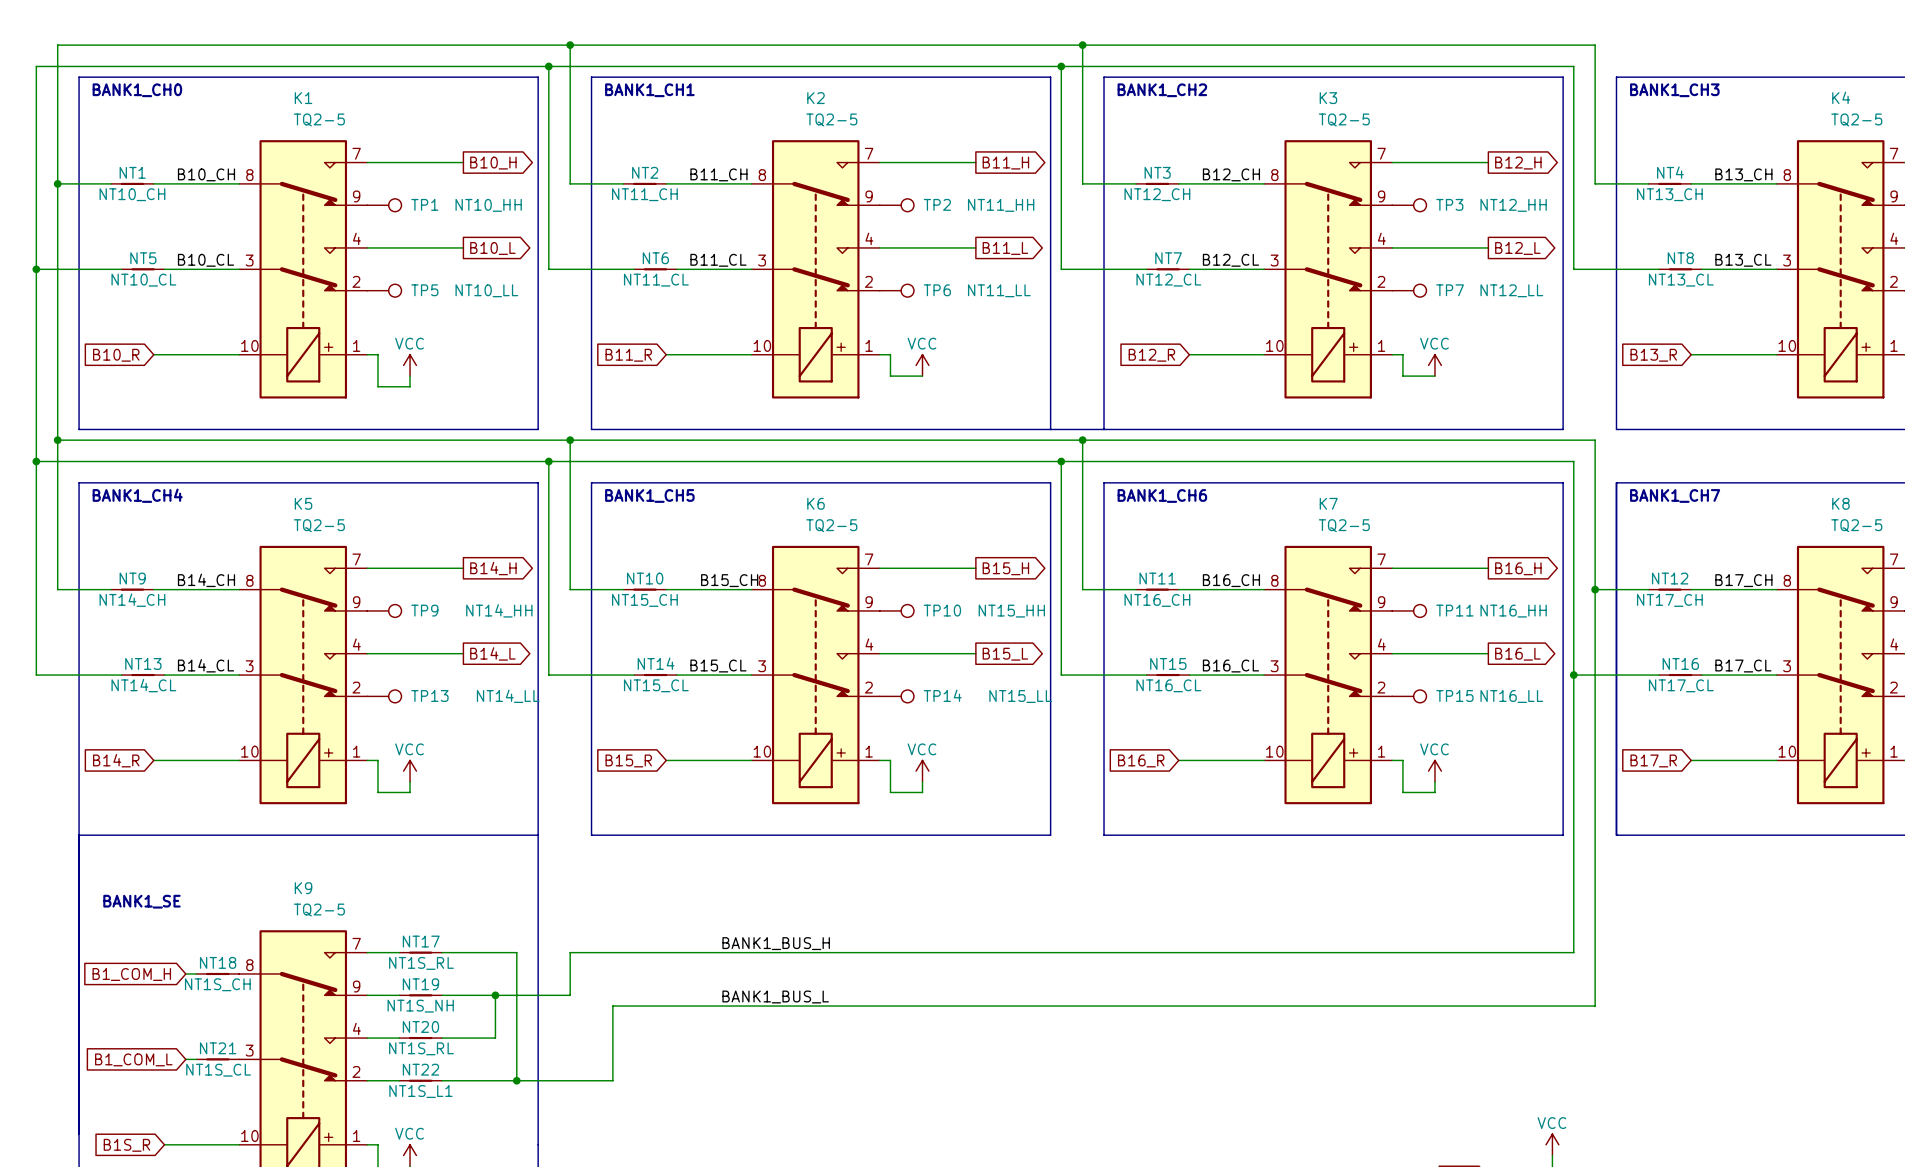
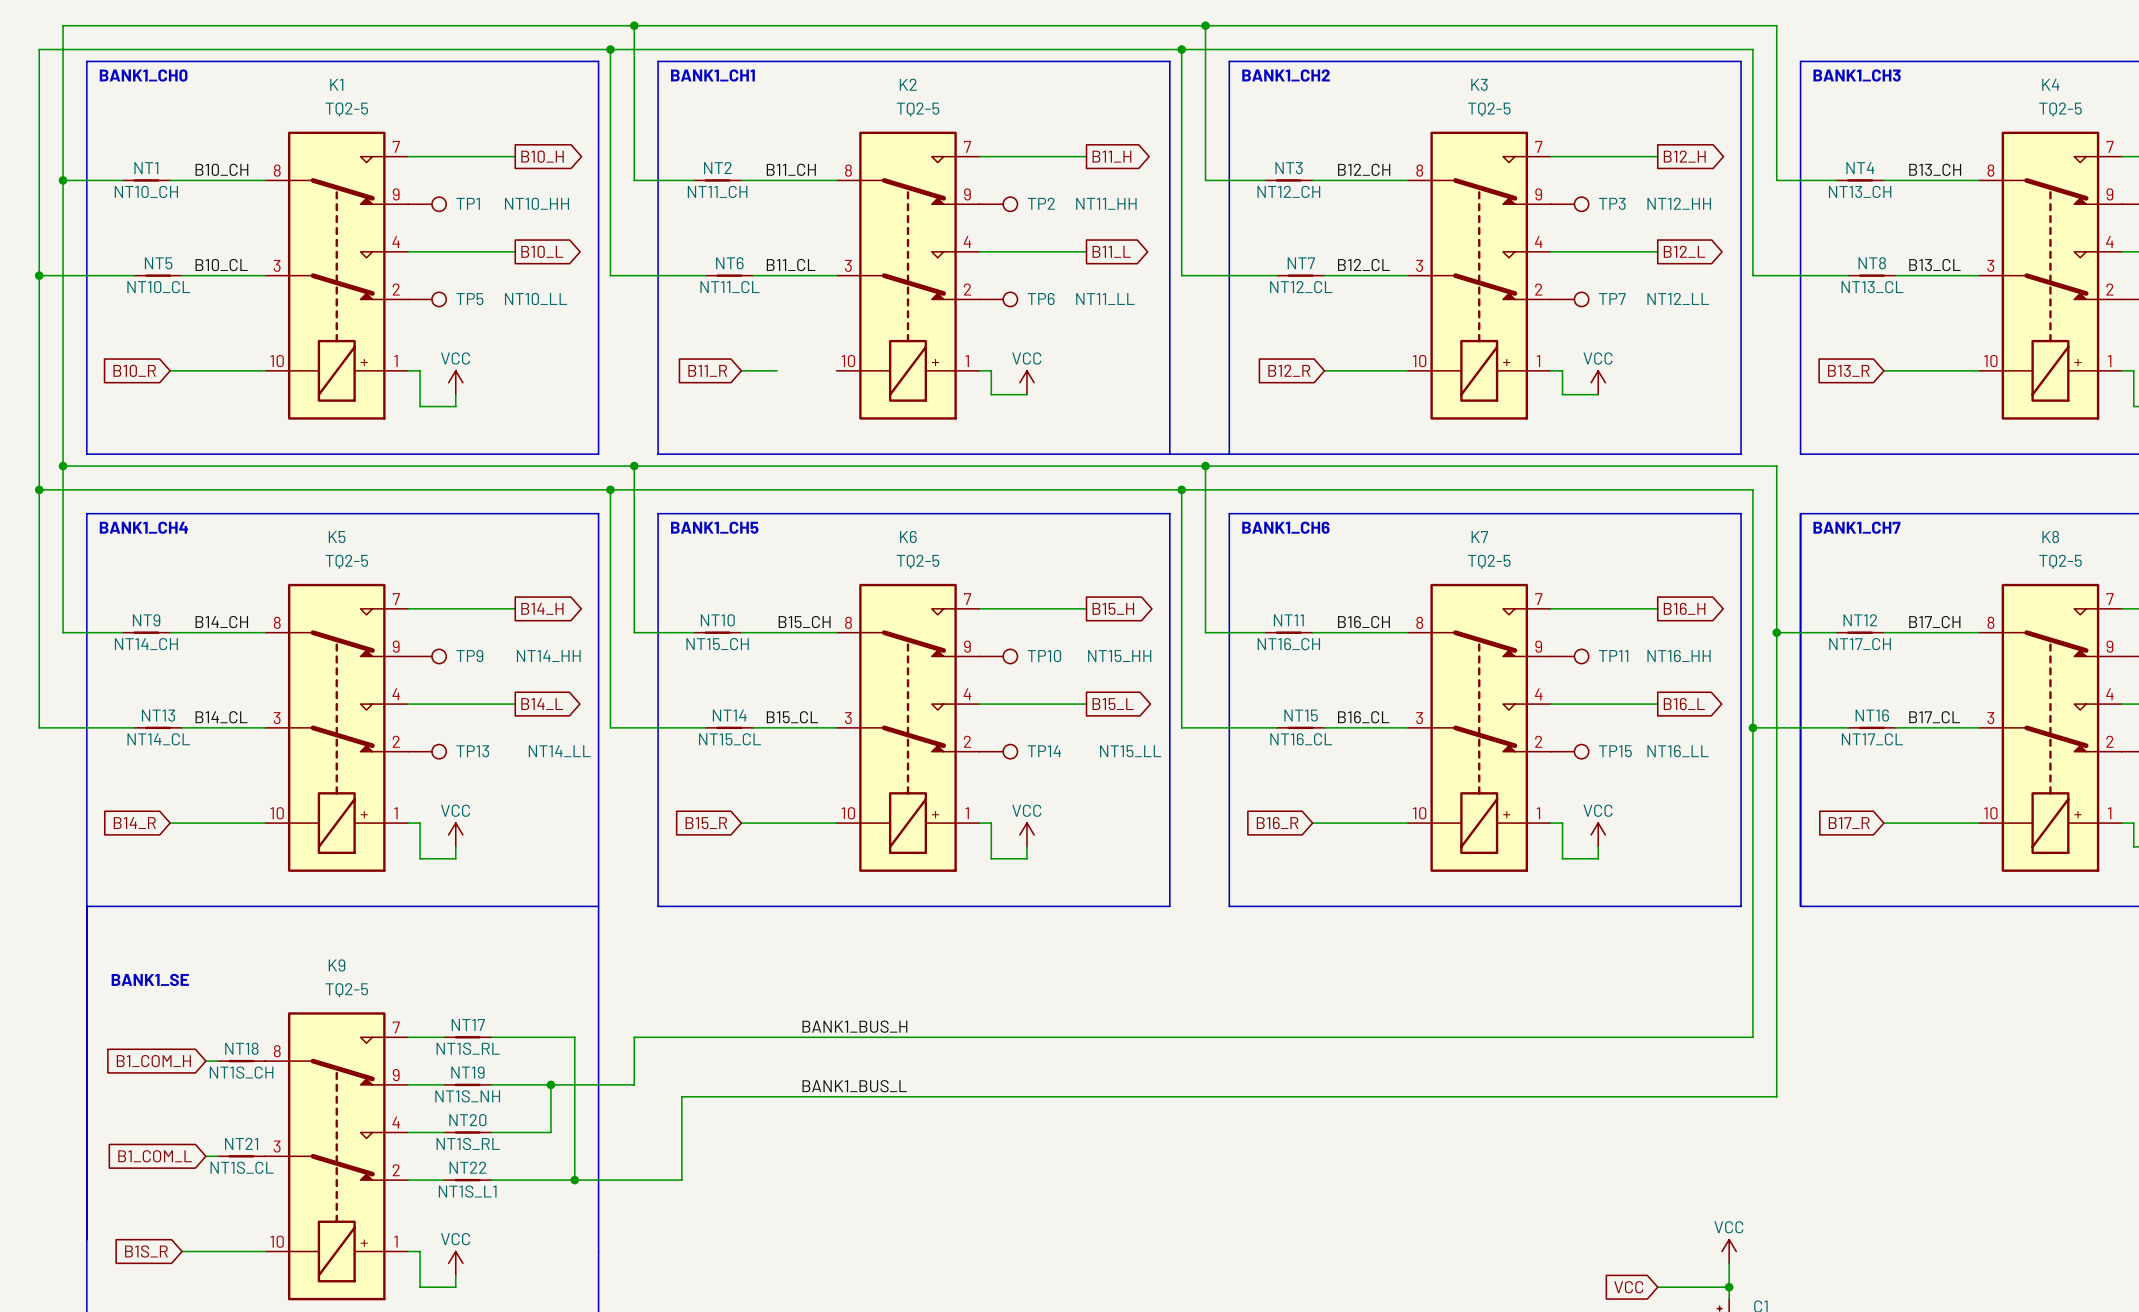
wire: (698, 354) (751, 354) -> none

